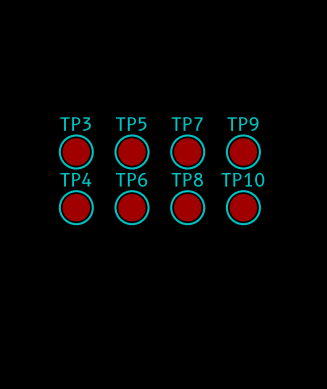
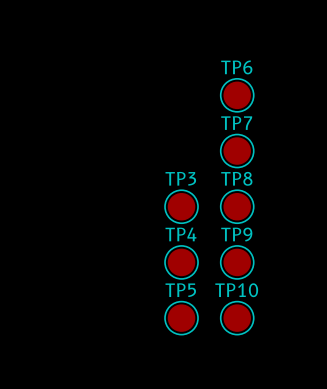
TP3 footprint: [58, 134, 94, 170] -> [164, 189, 199, 225]
TP5 footprint: [114, 134, 150, 170] -> [164, 300, 199, 336]
TP7 footprint: [170, 134, 206, 170] -> [219, 133, 255, 169]
TP9 footprint: [225, 134, 261, 170] -> [219, 245, 255, 280]
TP4 footprint: [58, 190, 94, 226] -> [164, 245, 199, 280]
TP6 footprint: [114, 190, 150, 226] -> [219, 78, 255, 113]
TP8 footprint: [170, 190, 206, 226] -> [219, 189, 255, 225]
TP10 footprint: [225, 190, 261, 226] -> [219, 300, 255, 336]

